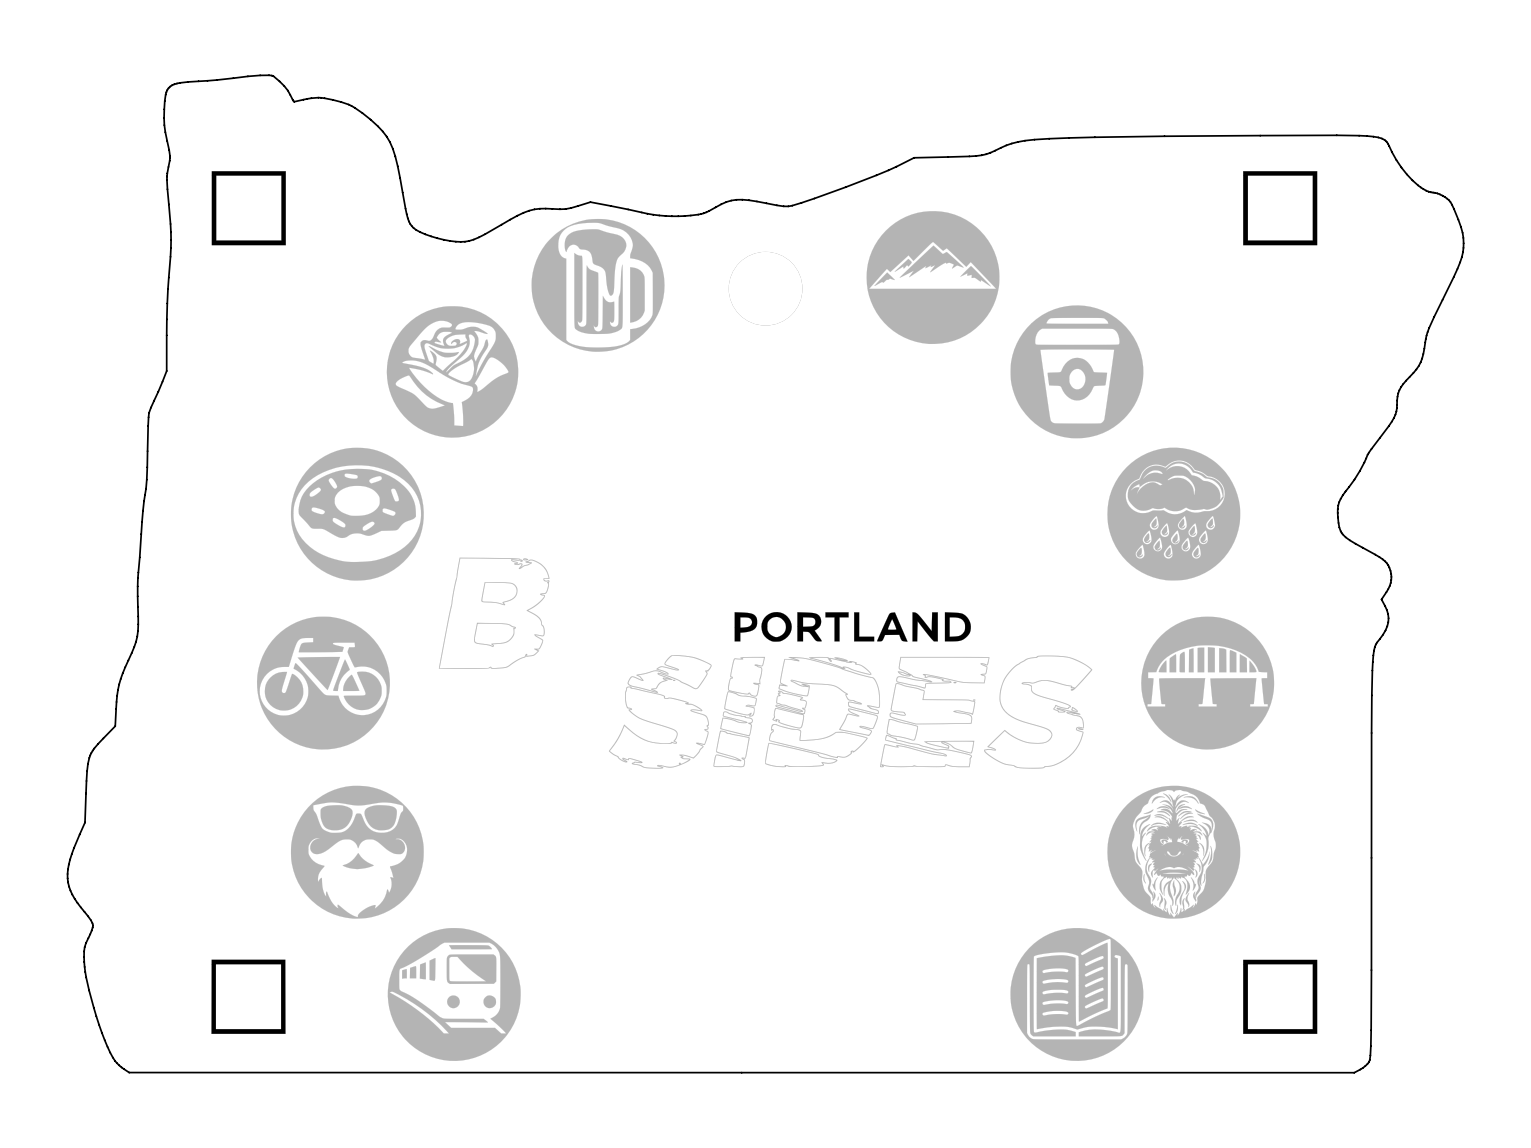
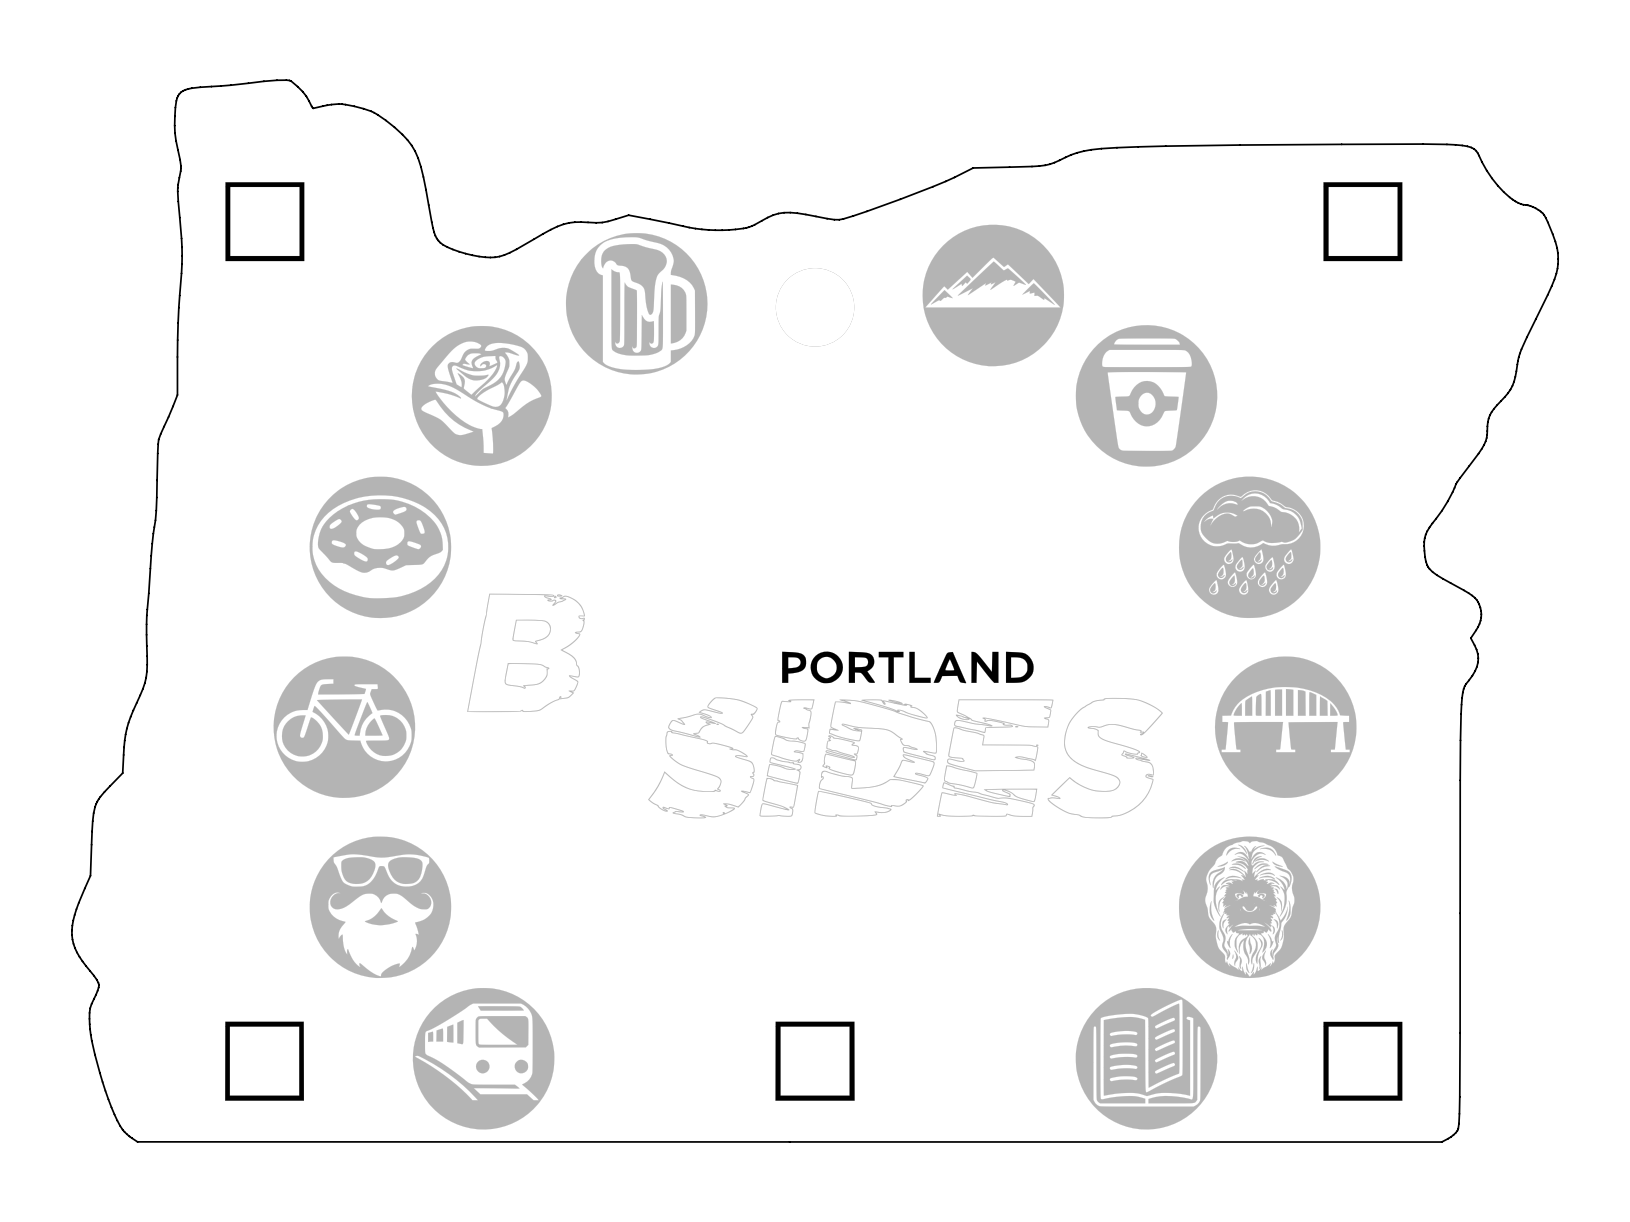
drawing shape: [211, 171, 1318, 1034] -> [225, 182, 1403, 1101]

